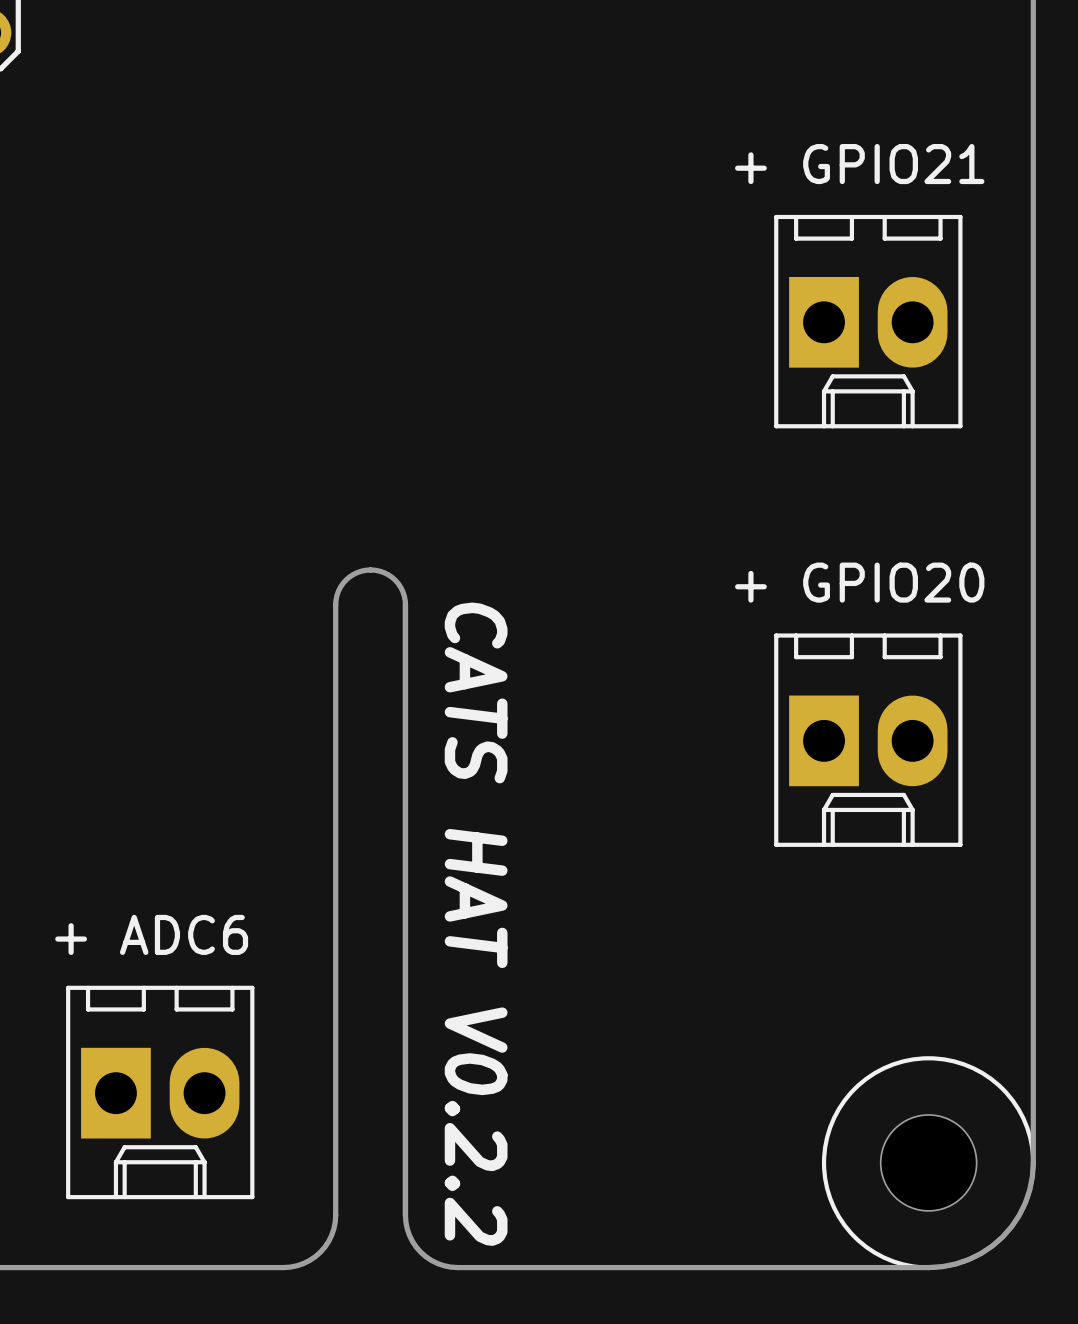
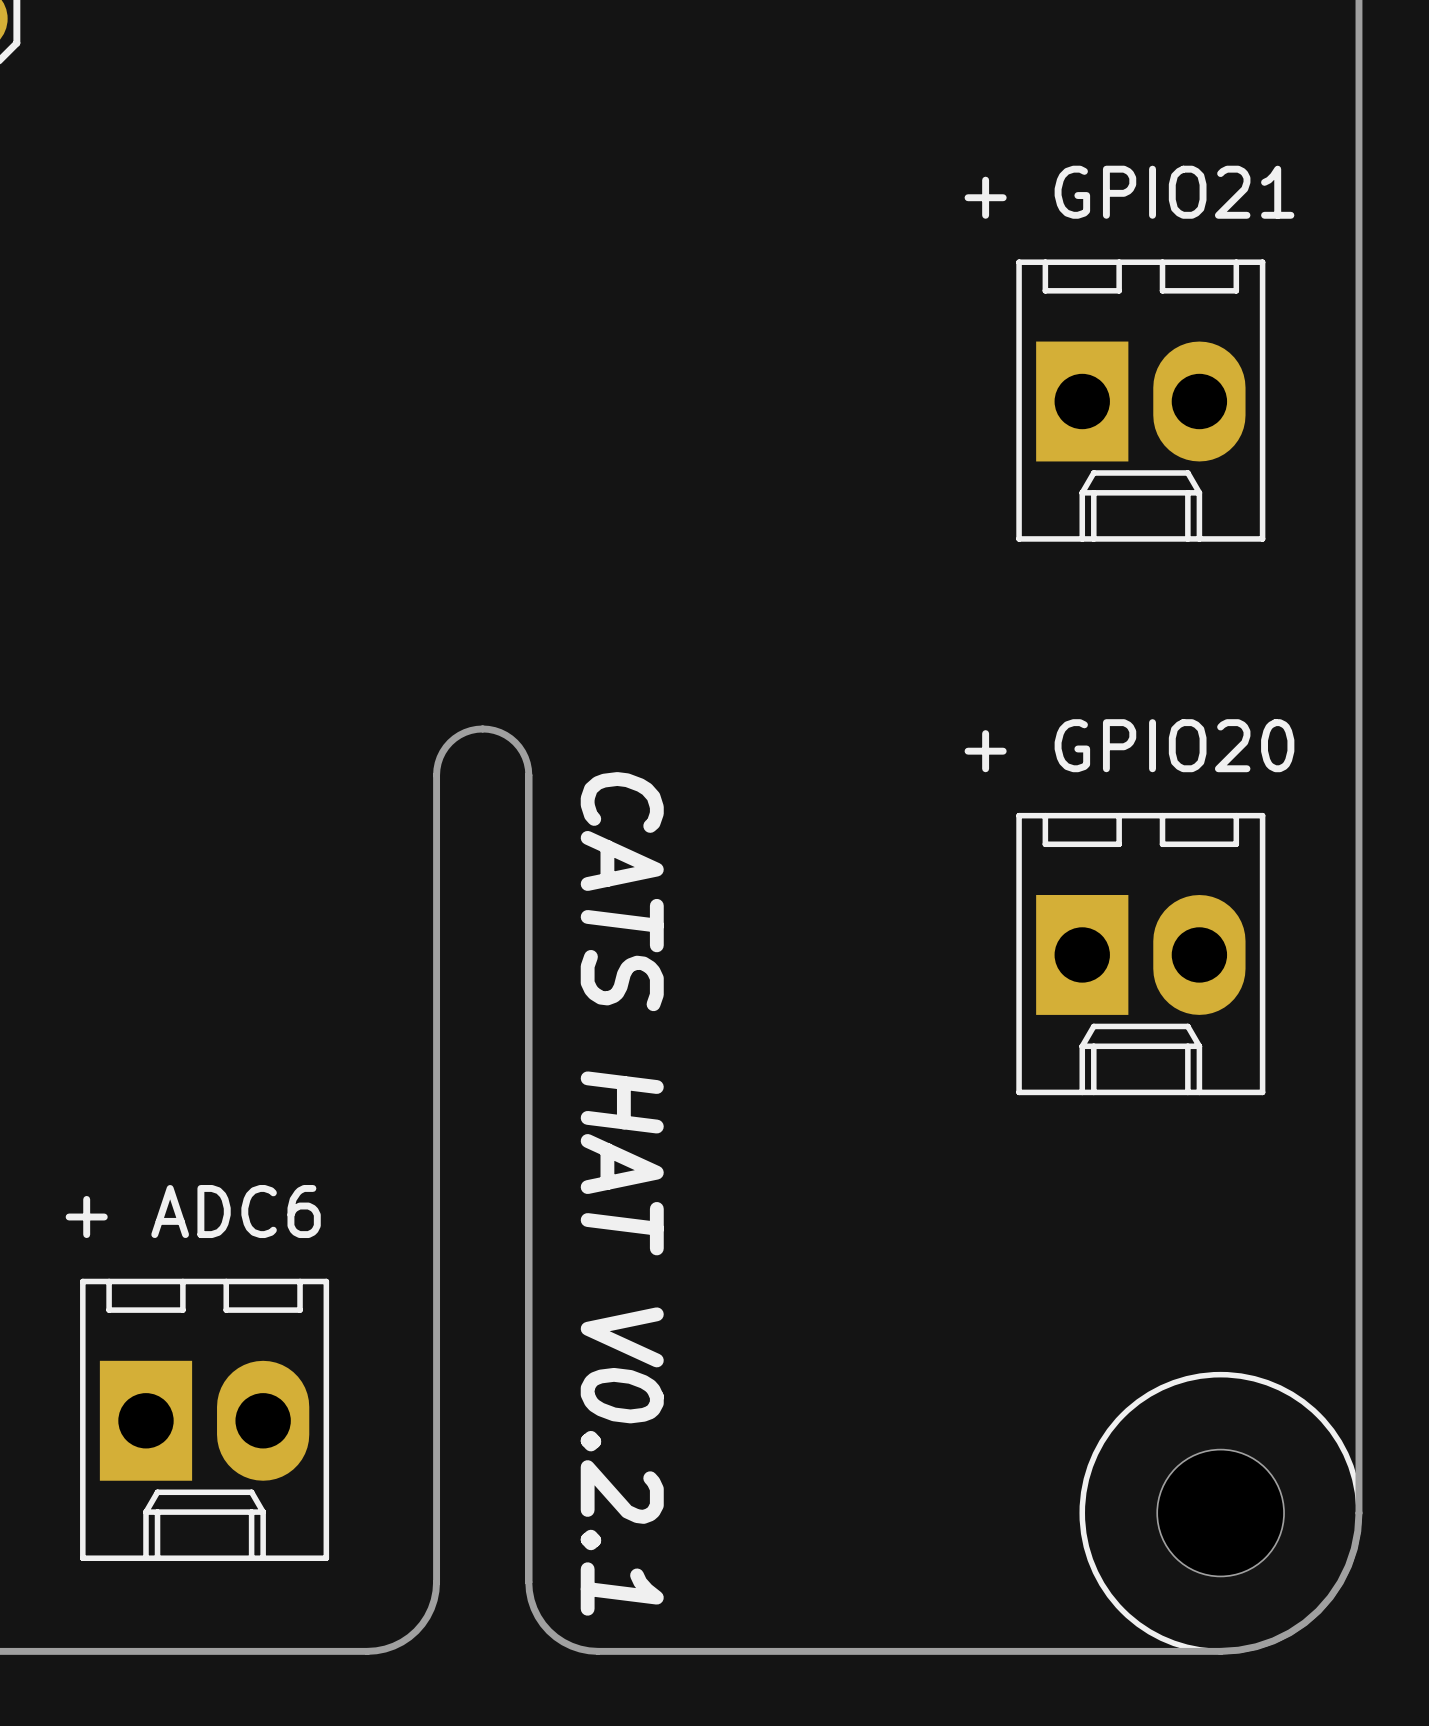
text: CATS HAT V0.2.2 (476, 924) -> CATS HAT V0.2.1 (622, 1193)

